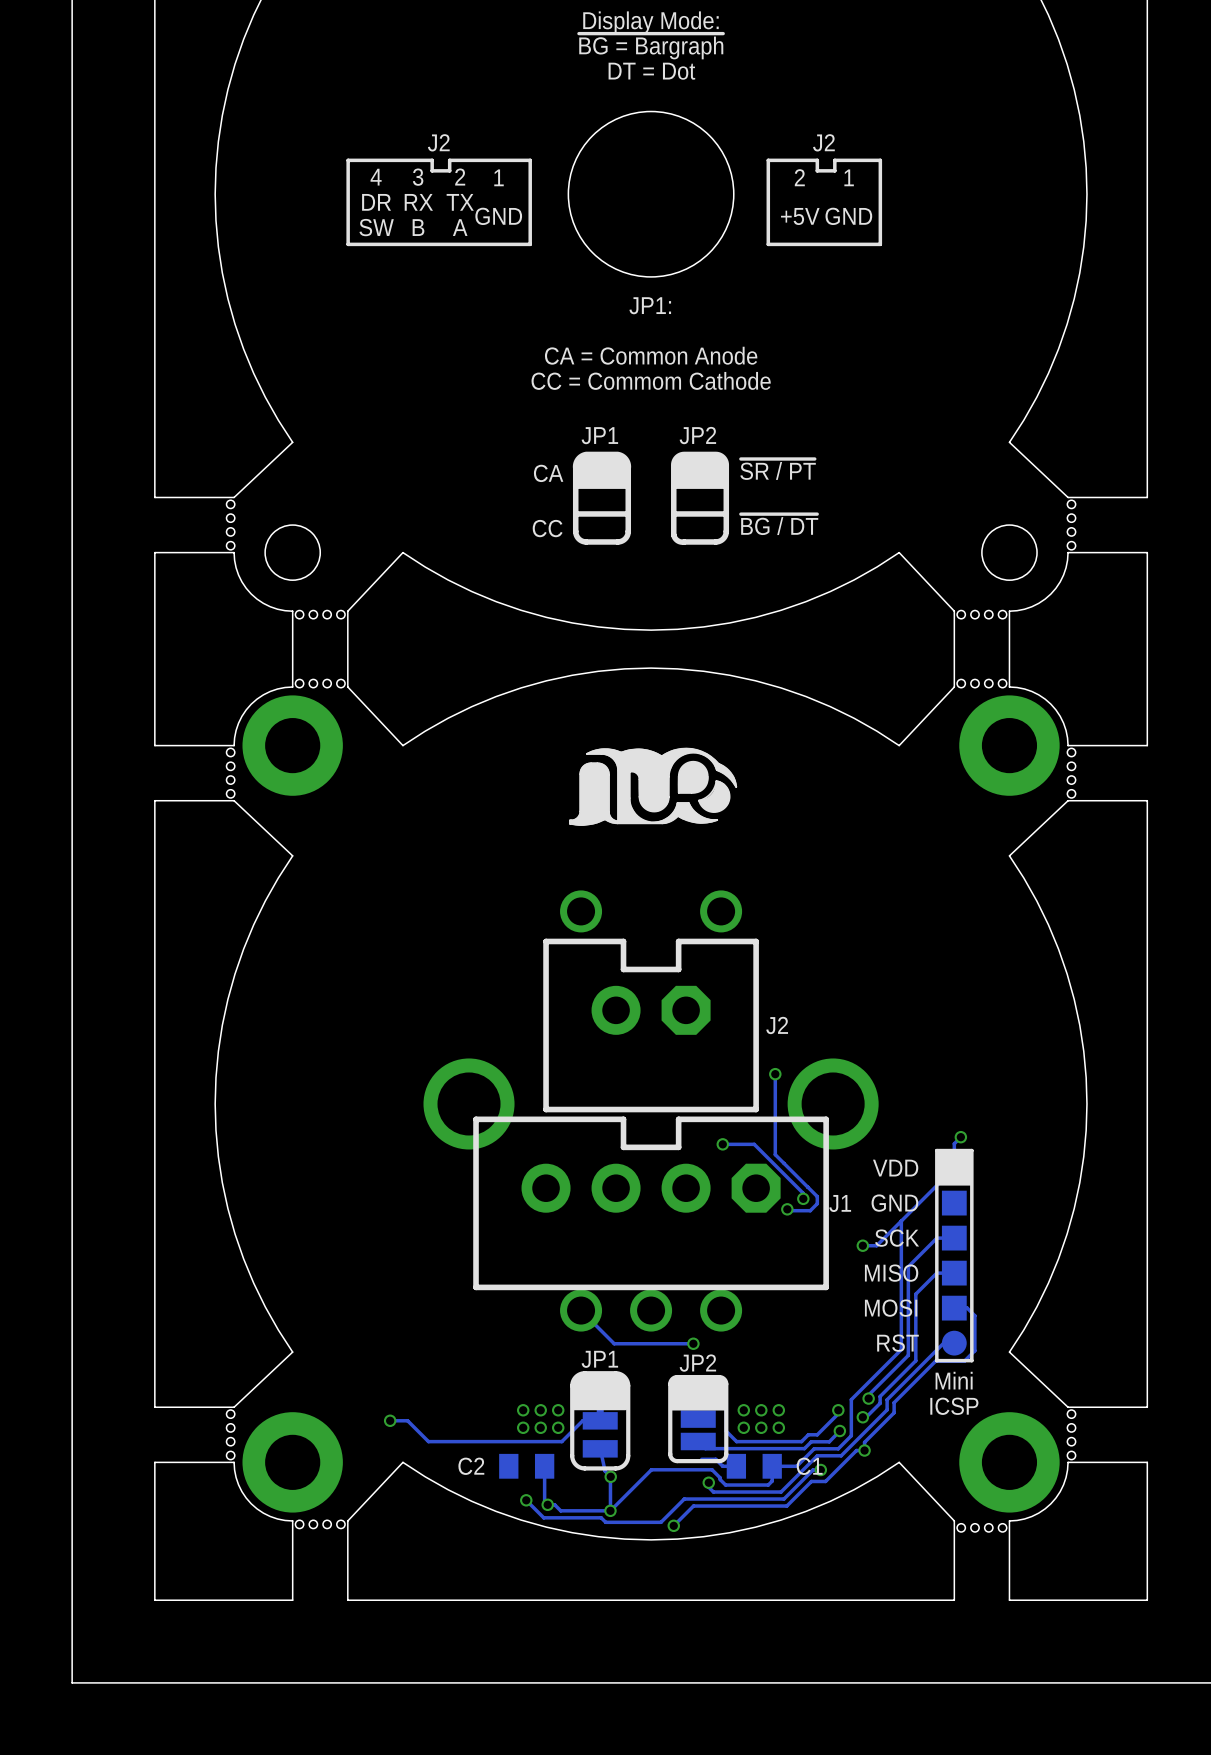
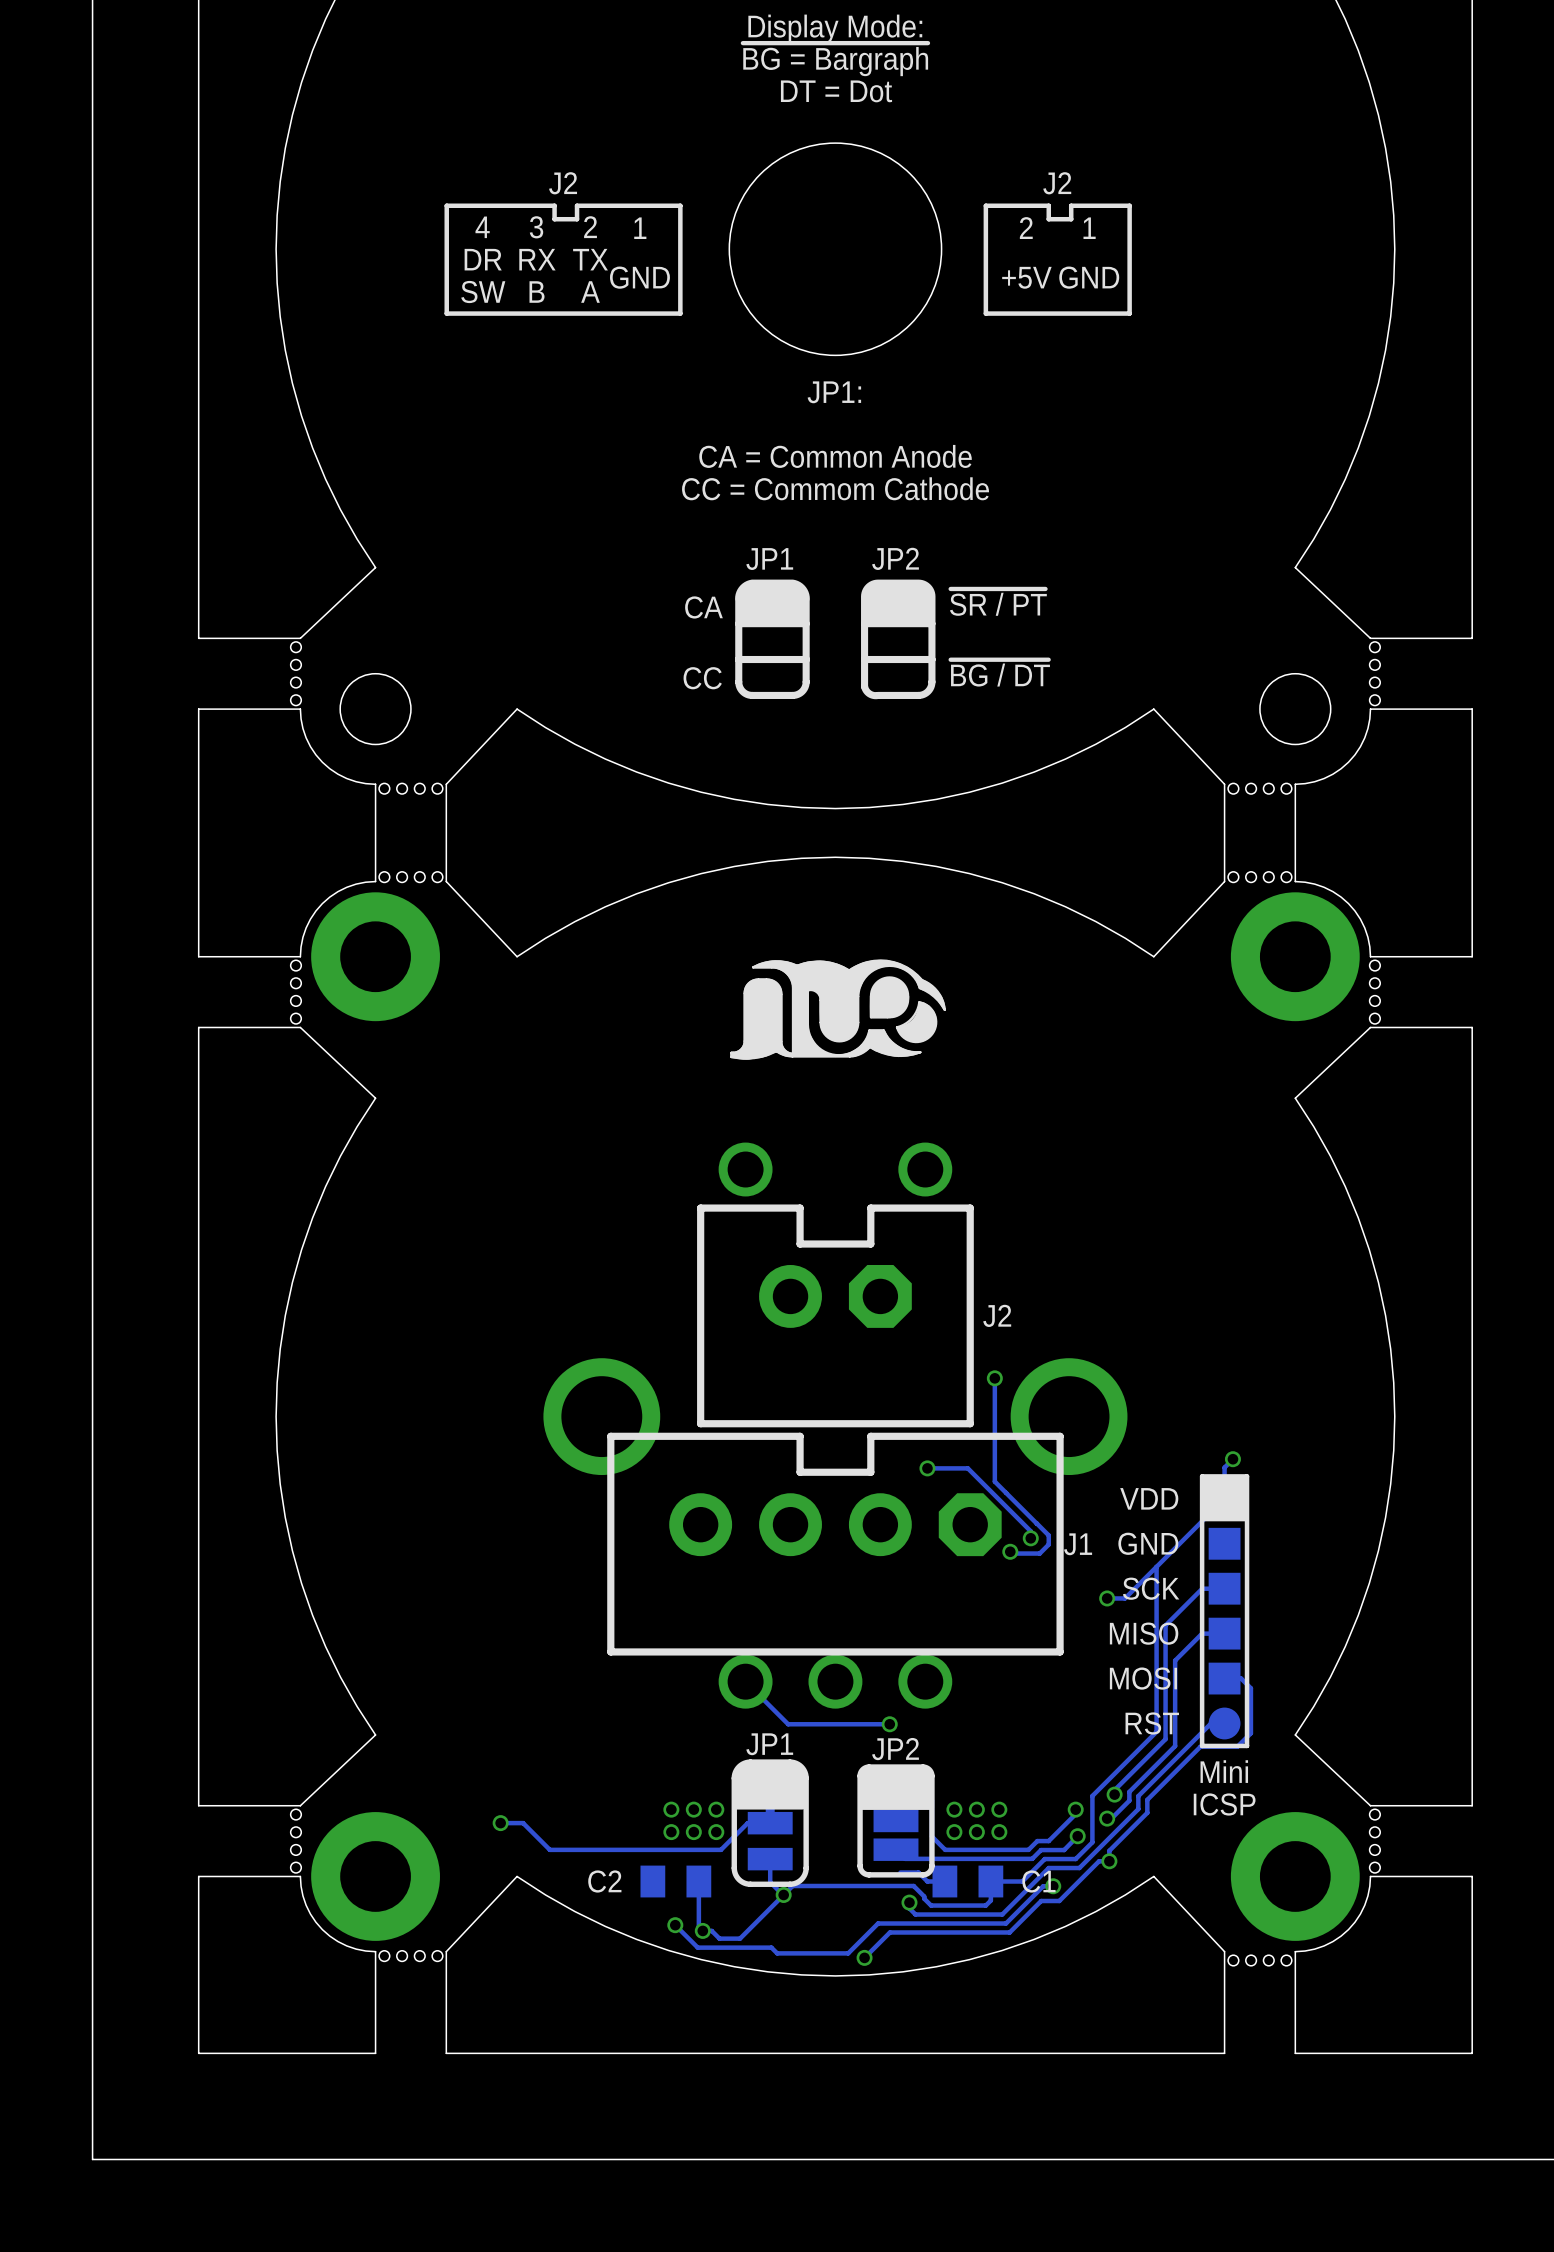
track: (600, 1448) (605, 1471) (610, 1476) -> (770, 1859) (770, 1882) (783, 1895) (740, 1938)
track: (651, 1469) (610, 1510) -> (835, 1886) (792, 1886) (783, 1894)
track: (610, 1477) (610, 1510) -> none
track: (610, 1510) (576, 1510) -> none
via: (610, 1510) -> none

